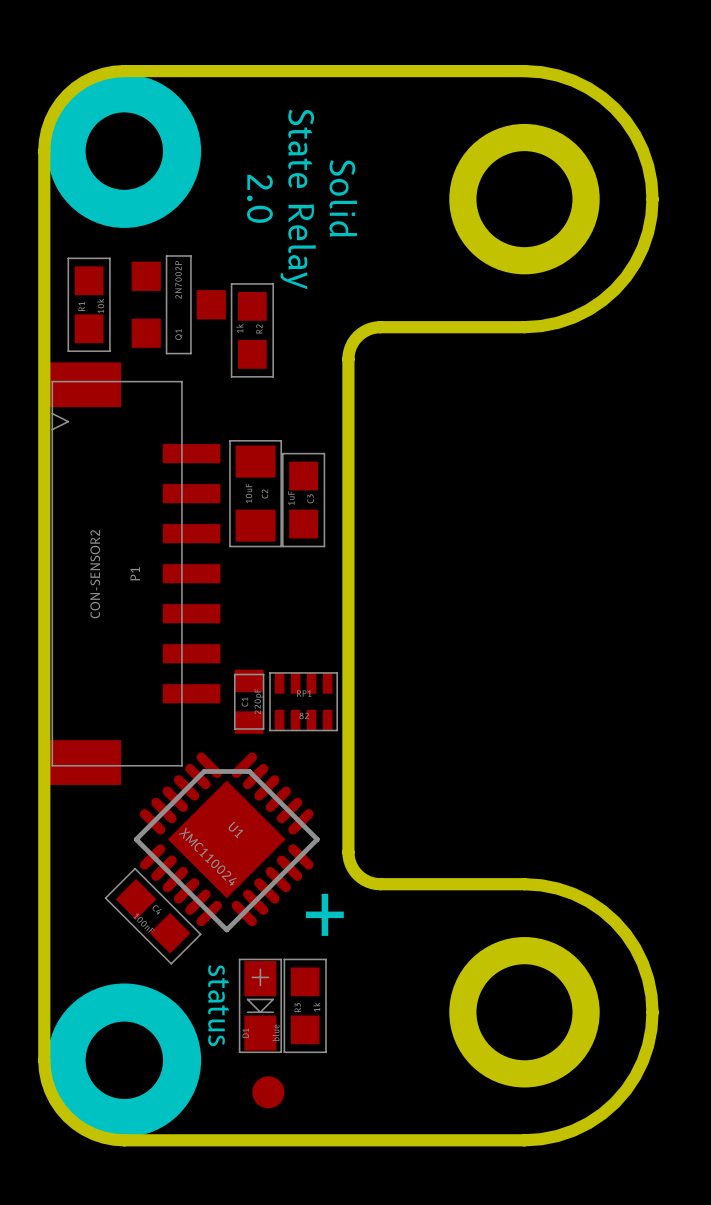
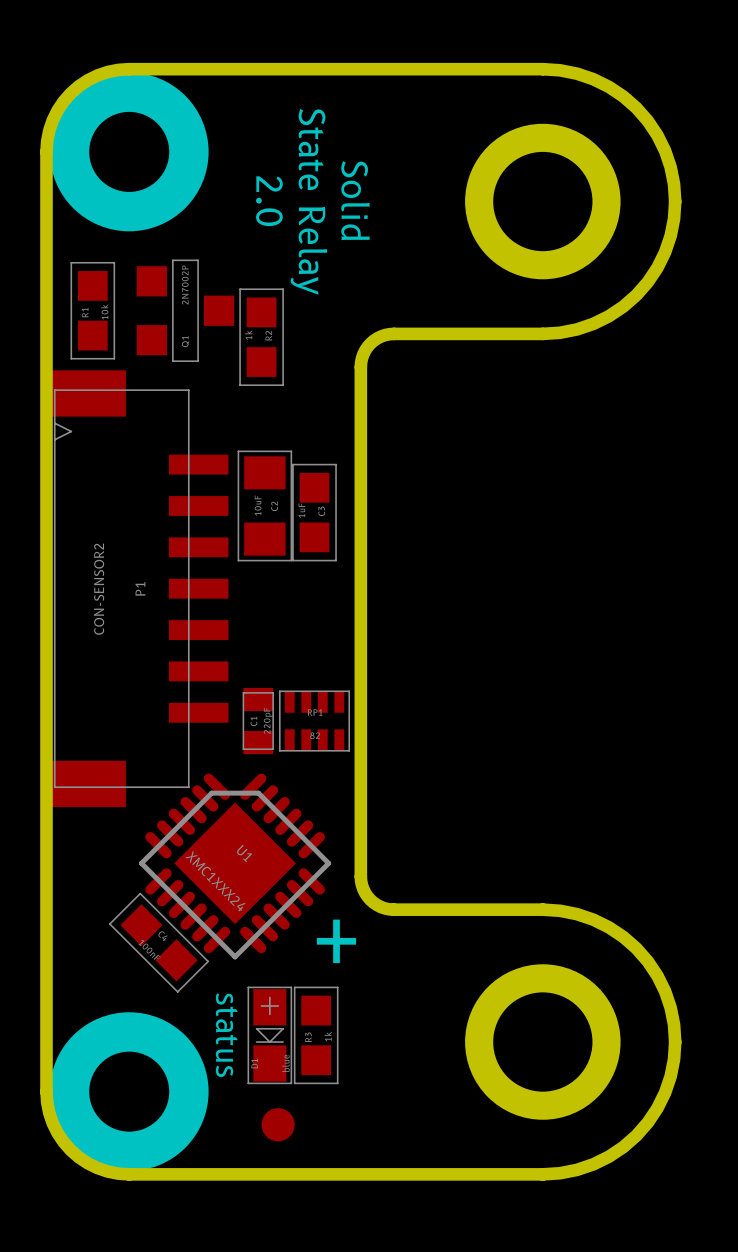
U1 value: XMC110024 (207, 856) -> XMC1XXX24 (215, 881)

